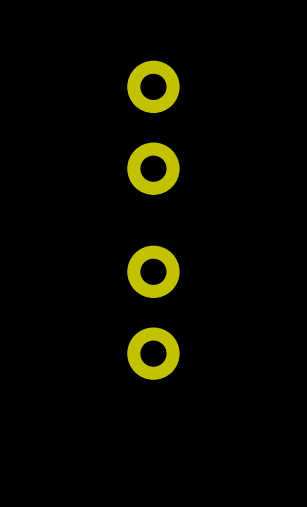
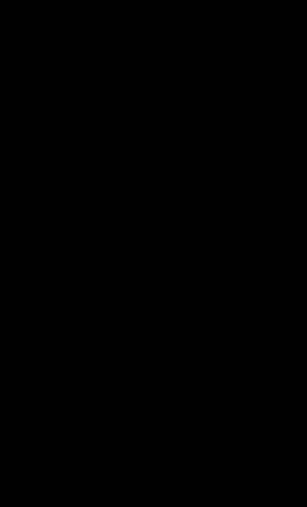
part: (153, 127) -> none
part: (153, 312) -> none

